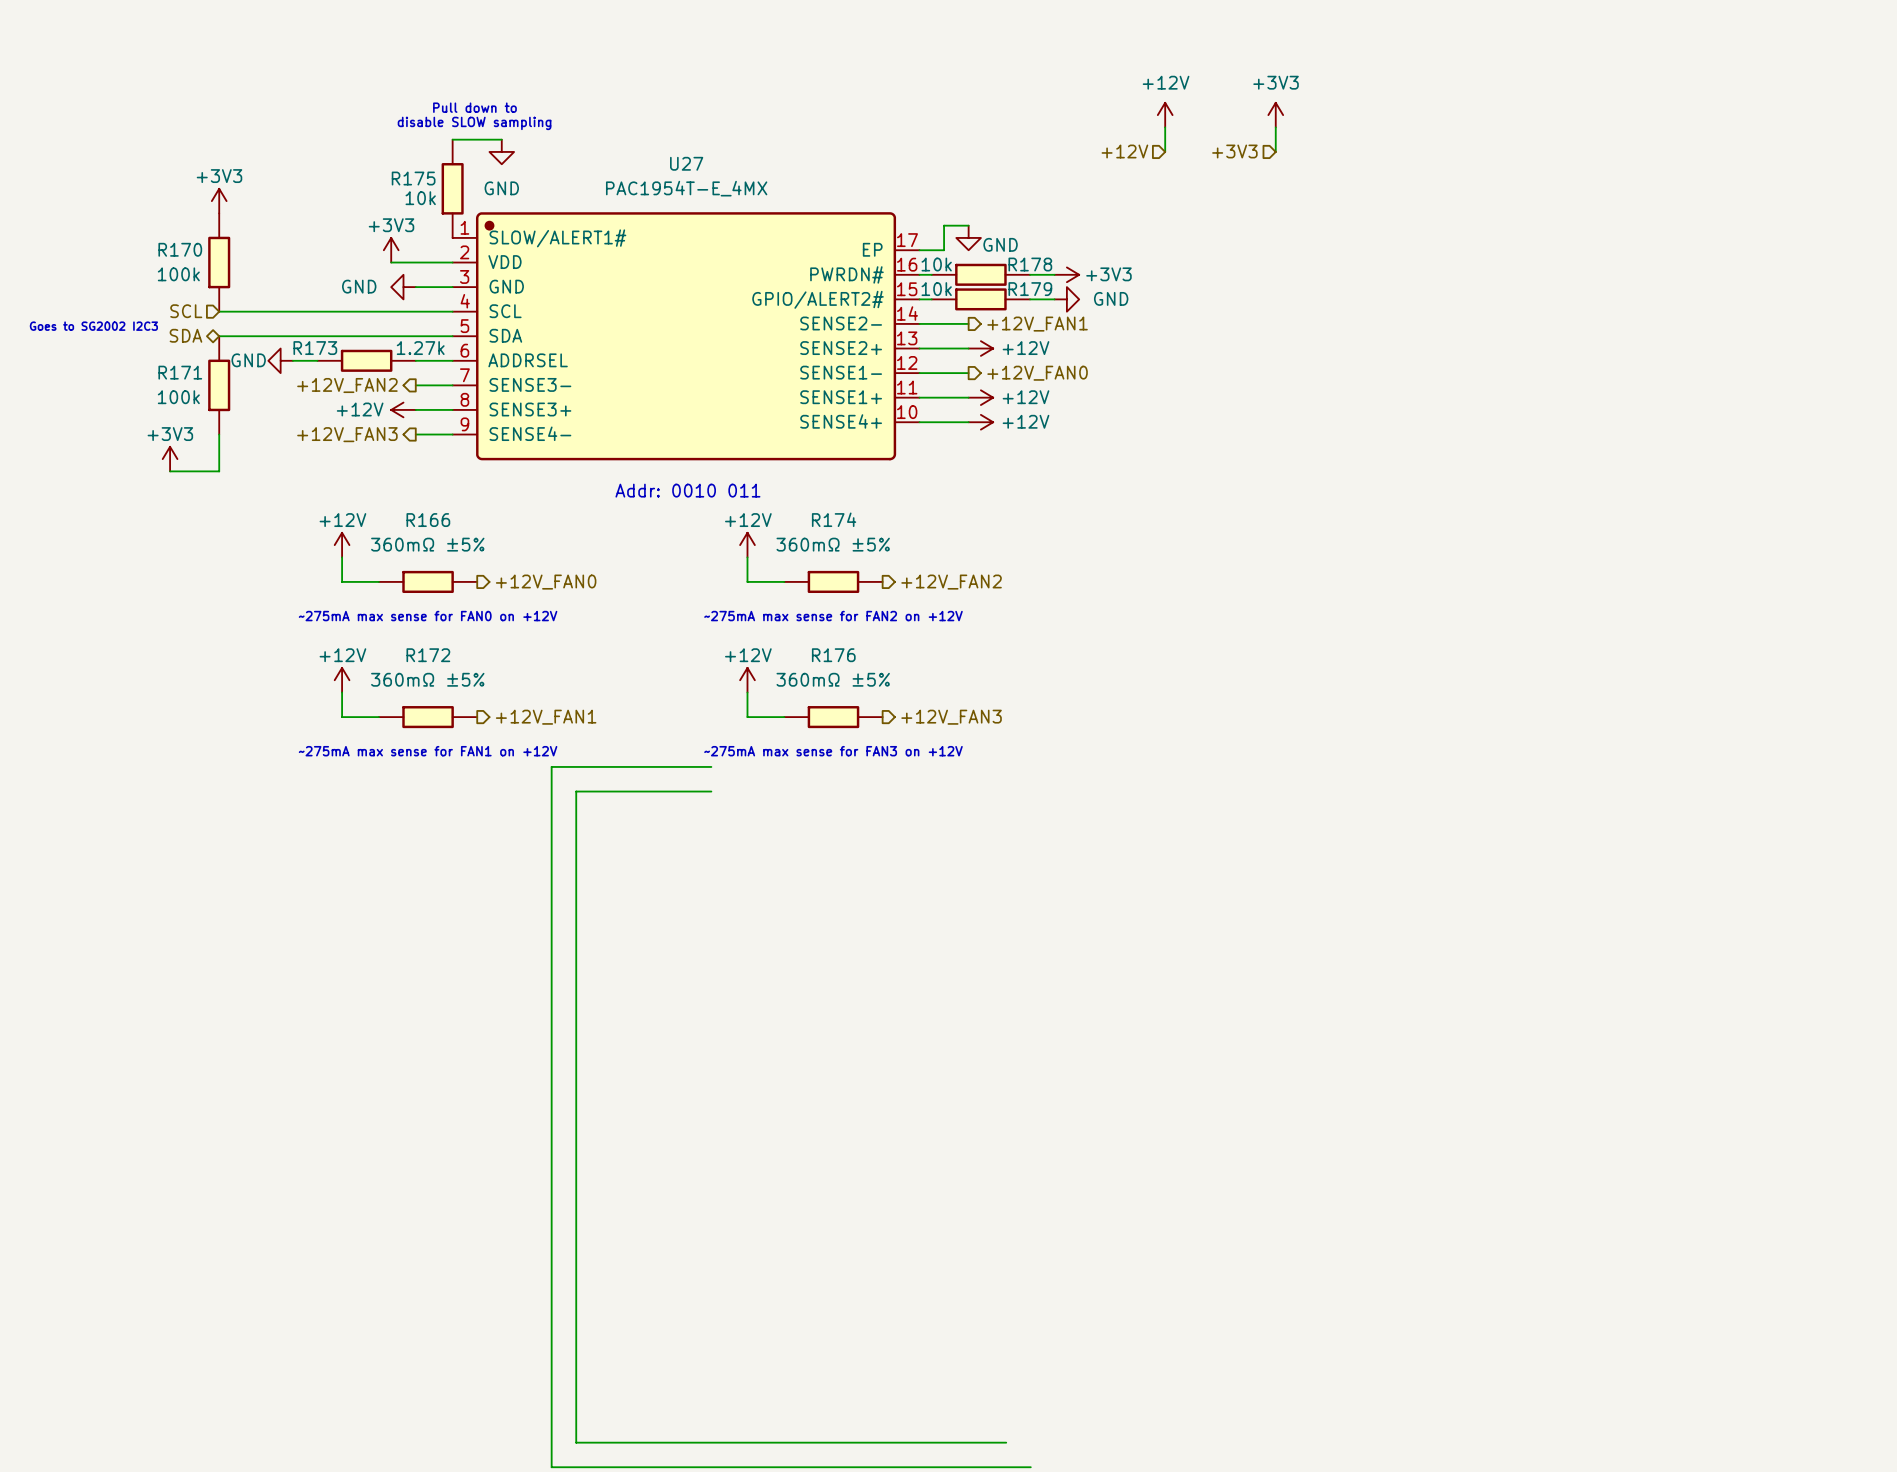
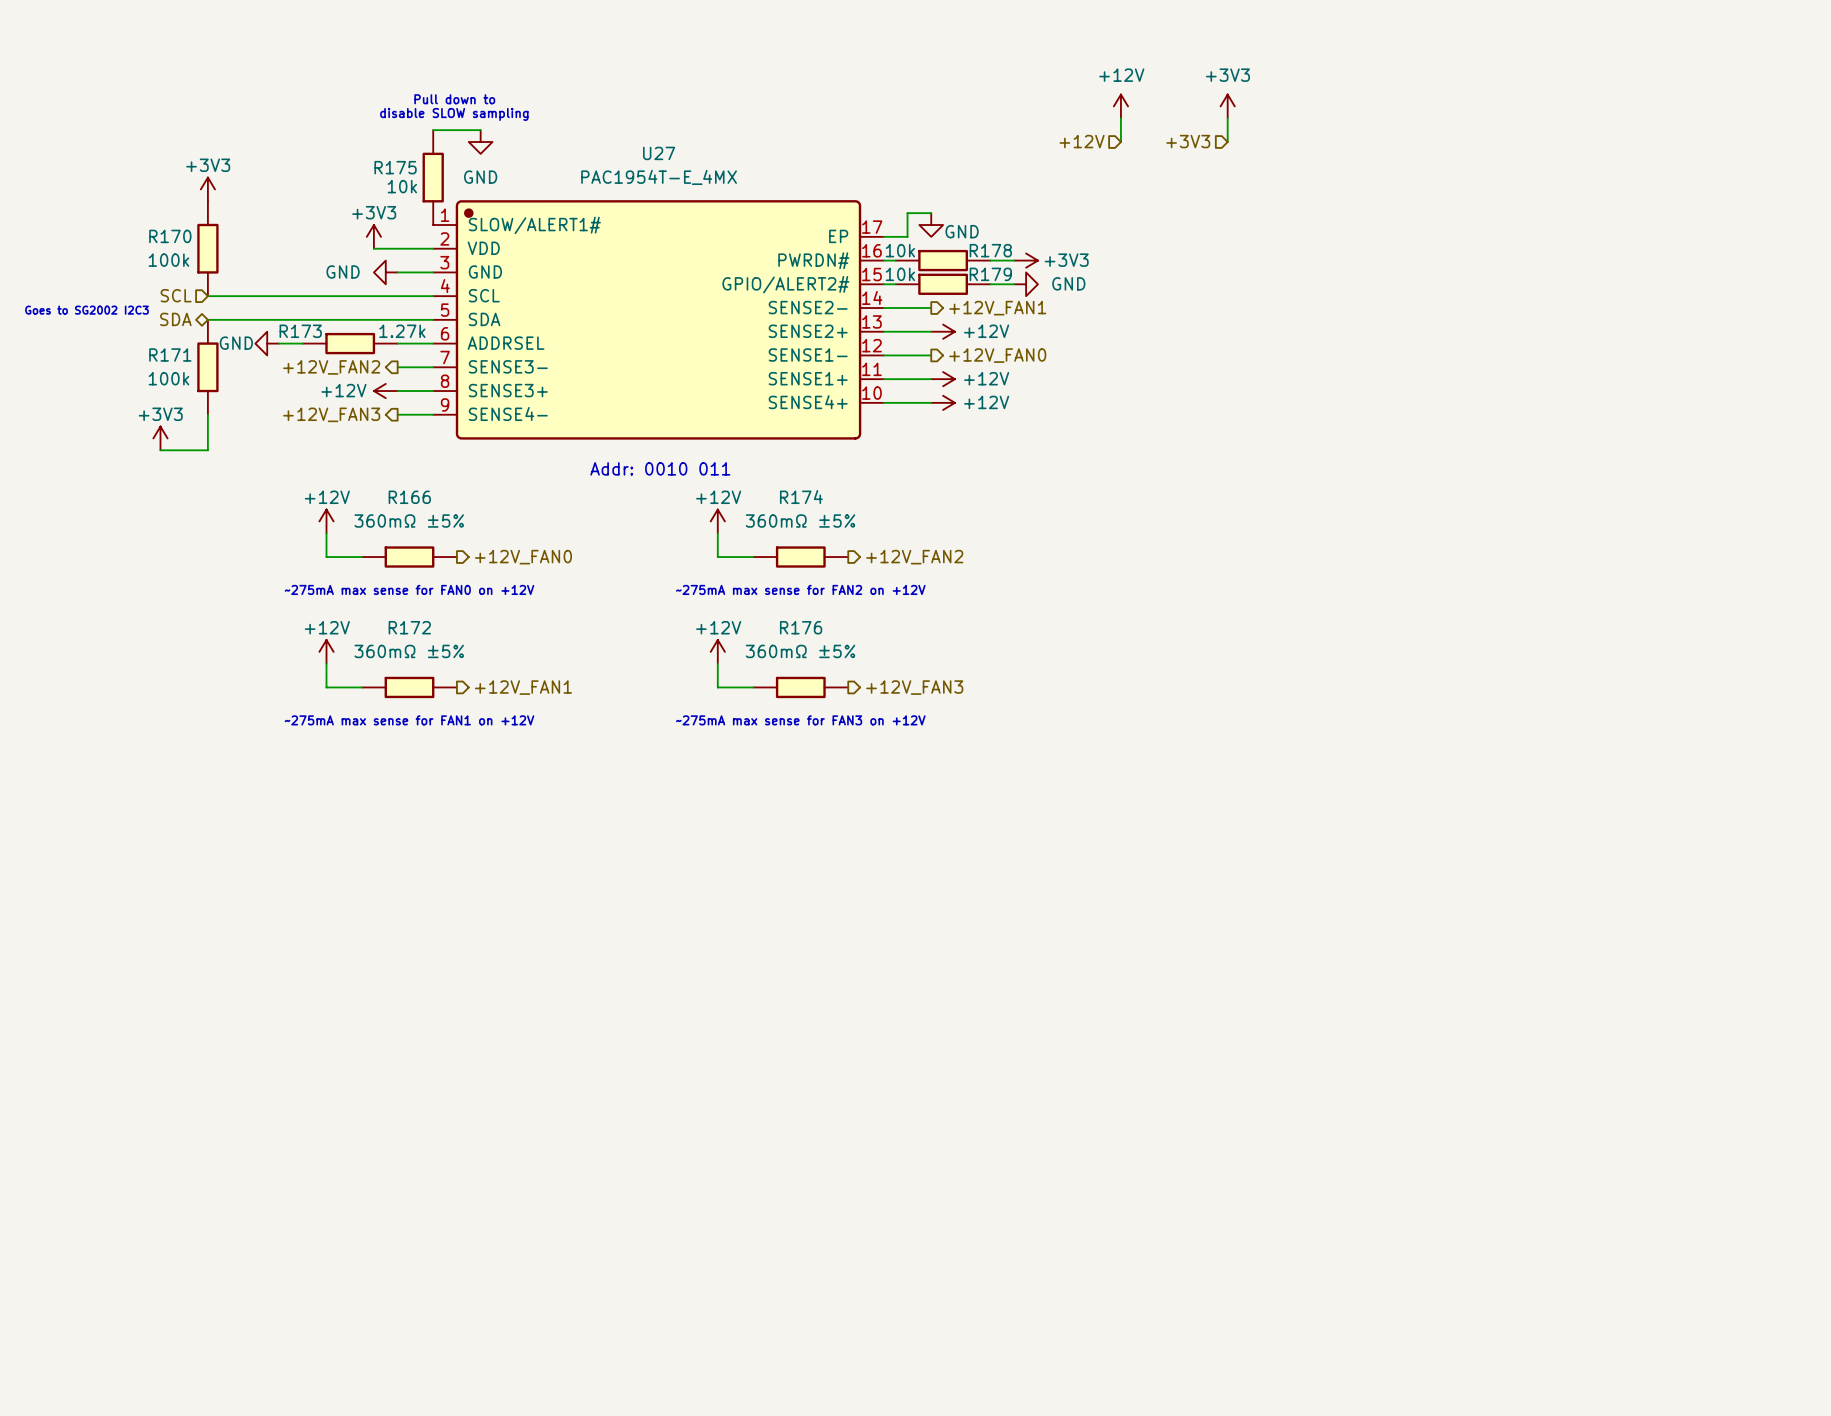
wire: (711, 766) (551, 766) (551, 1467) (1030, 1467) -> none
wire: (711, 791) (576, 791) (576, 1442) (1006, 1442) -> none

